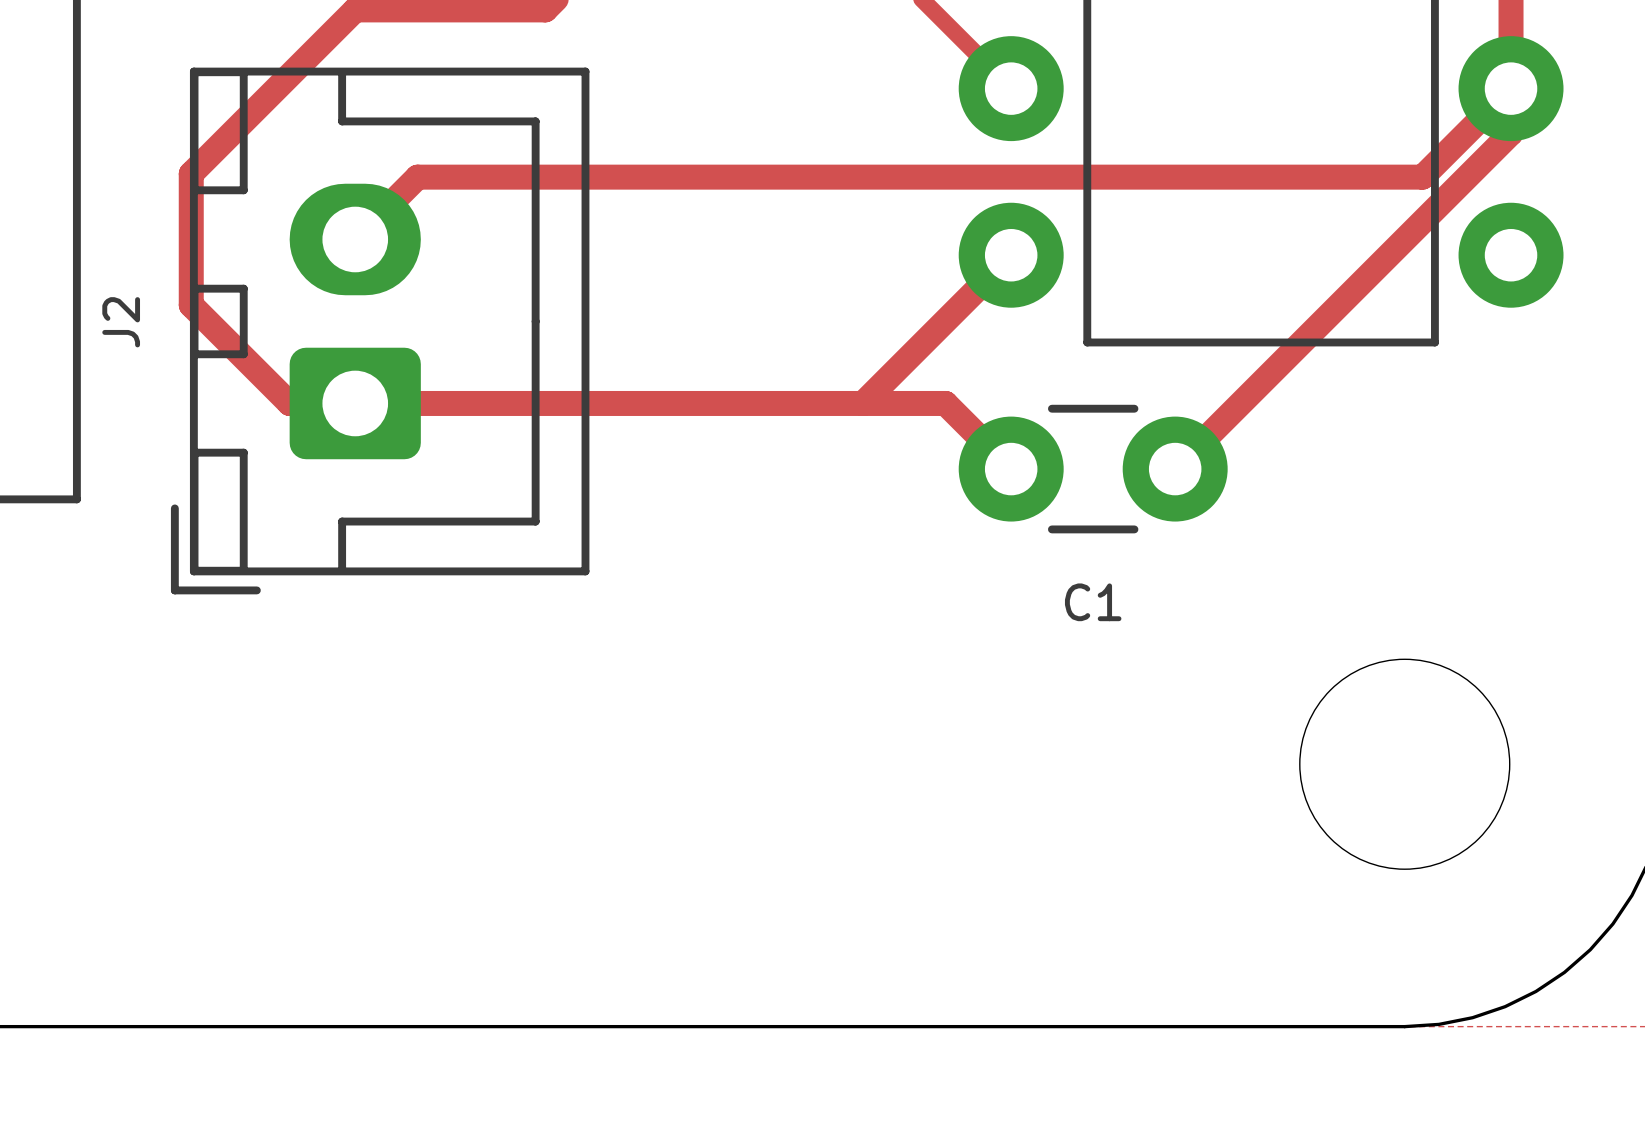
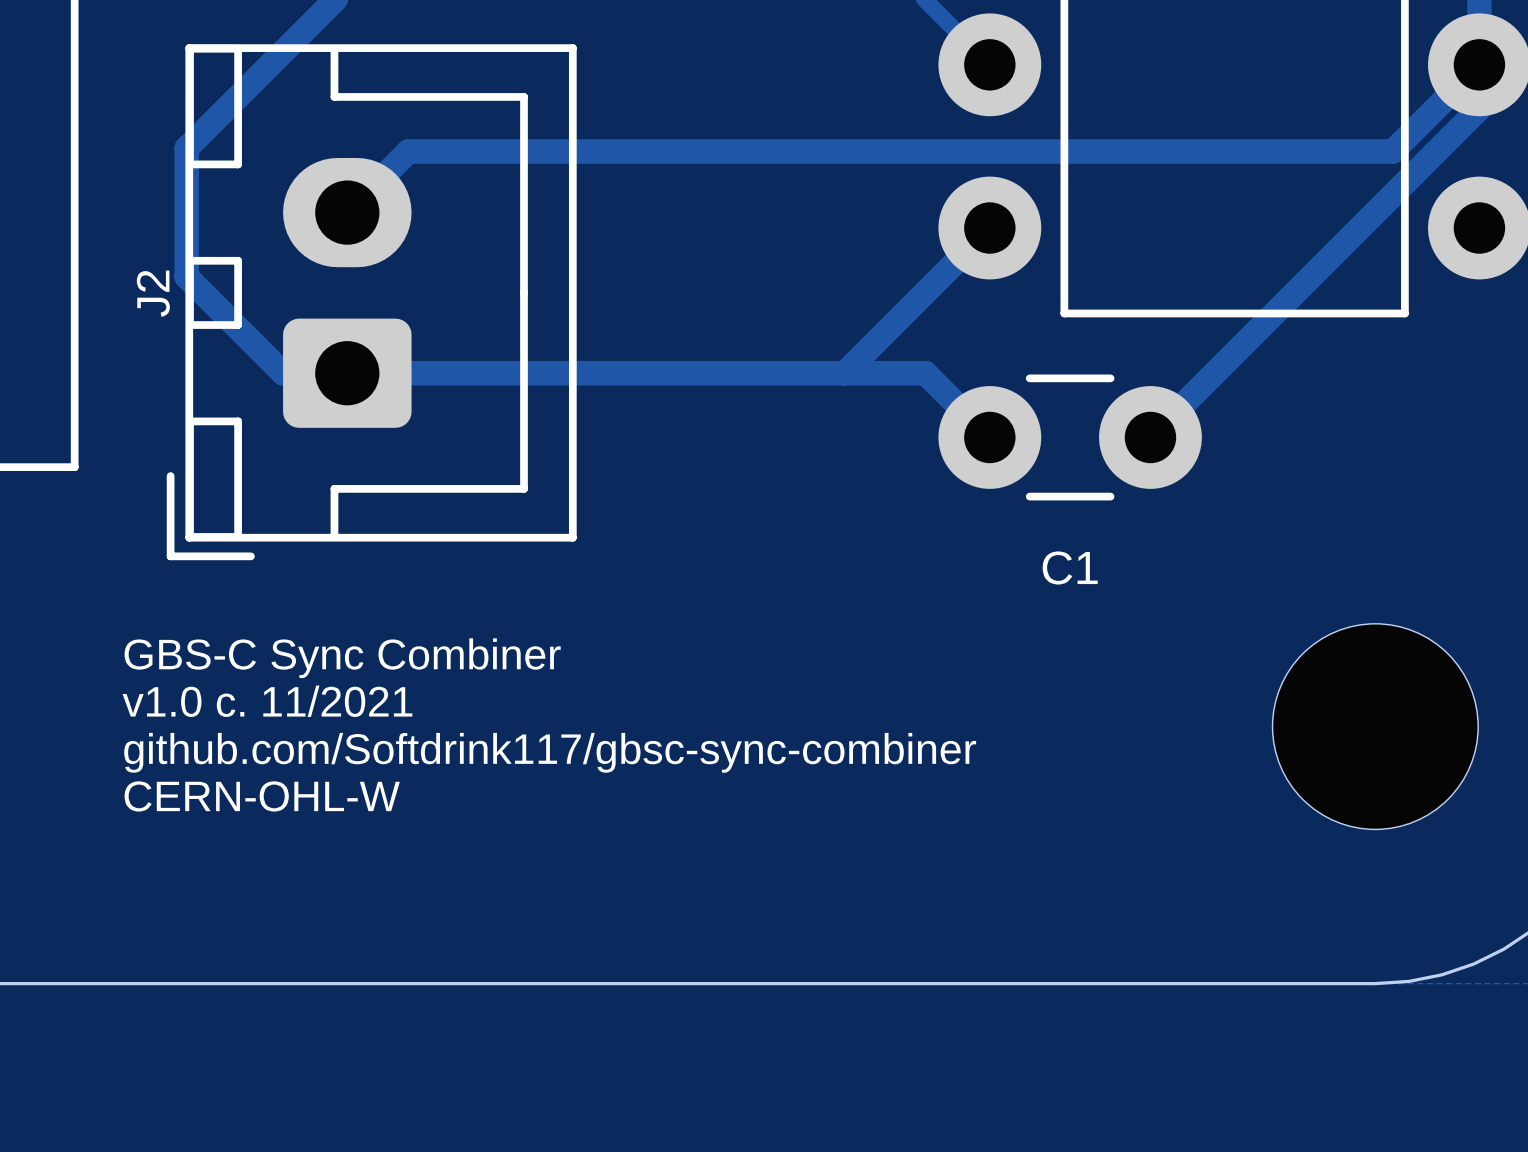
J2 name position: J2 (121, 322) -> J2 (153, 293)
text: none -> GBS-C Sync Combiner (342, 658)
text: none -> v1.0 c. 11/2021 (267, 701)
text: none -> github.com/Softdrink117/gbsc-sync-combiner (550, 752)
text: none -> CERN-OHL-W (262, 796)

